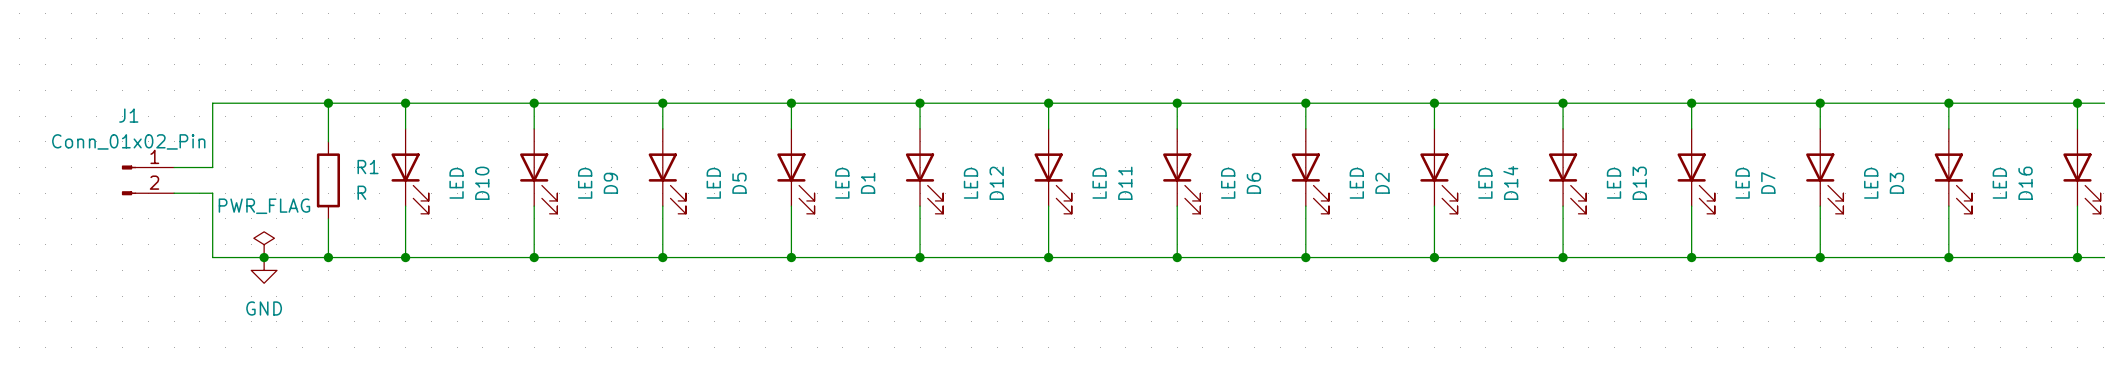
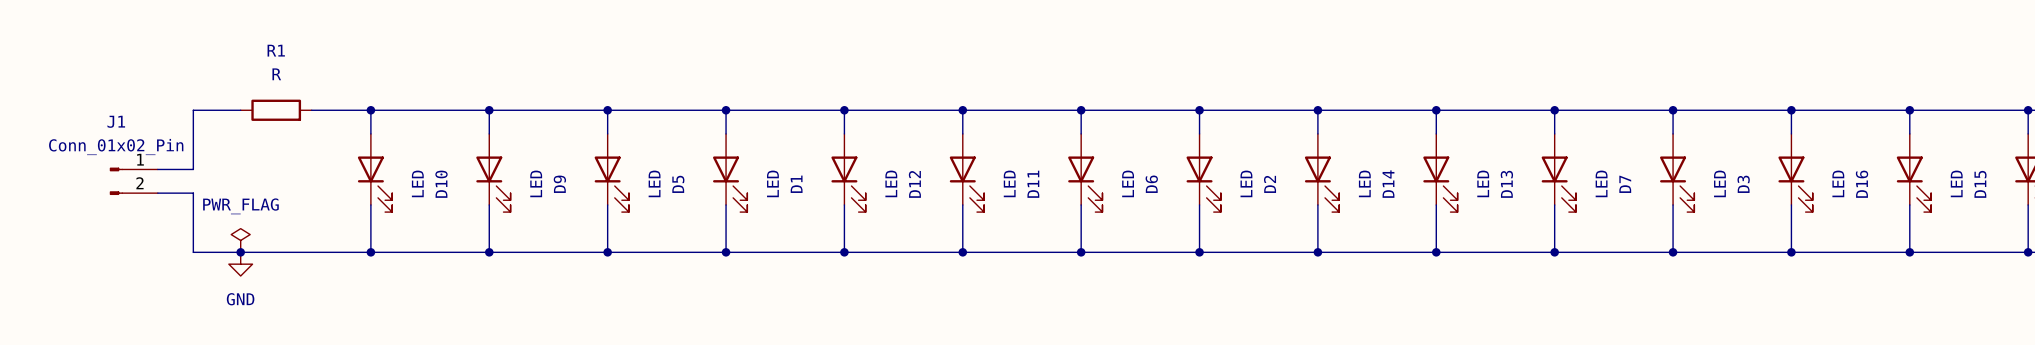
wire: (264, 103) (341, 103) -> none
wire: (328, 103) (328, 141) -> none
junction: (328, 103) -> none
R1 name position: R1 (368, 167) -> R1 (276, 50)
R1 rotation: 0° (328, 180) -> 90° clockwise (276, 110)
R1 position: (328, 180) -> (276, 110)
R1 value position: R (361, 192) -> R (276, 74)
wire: (328, 218) (328, 257) -> none
junction: (328, 257) -> none

